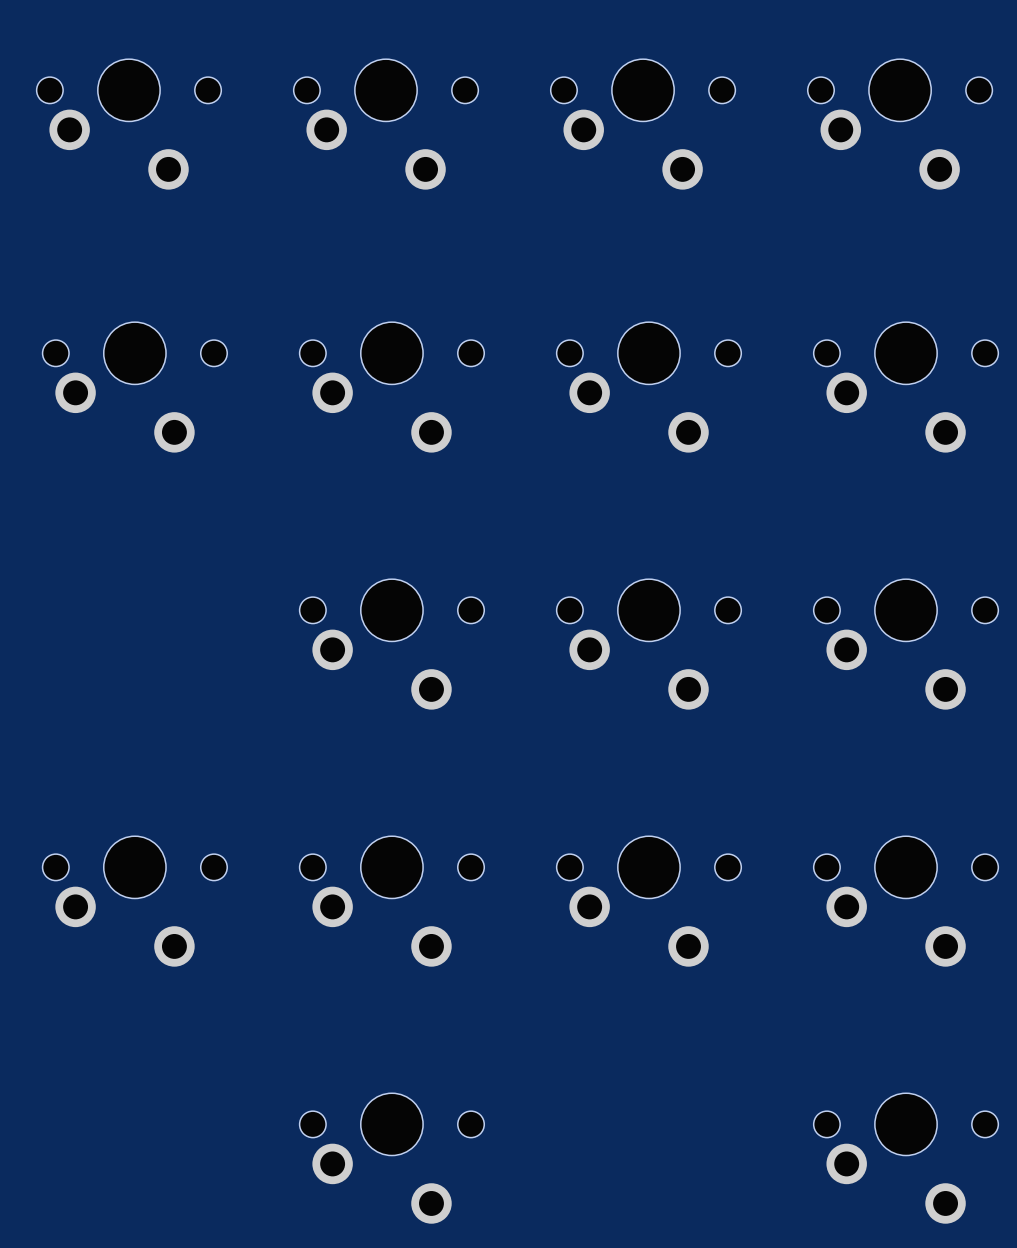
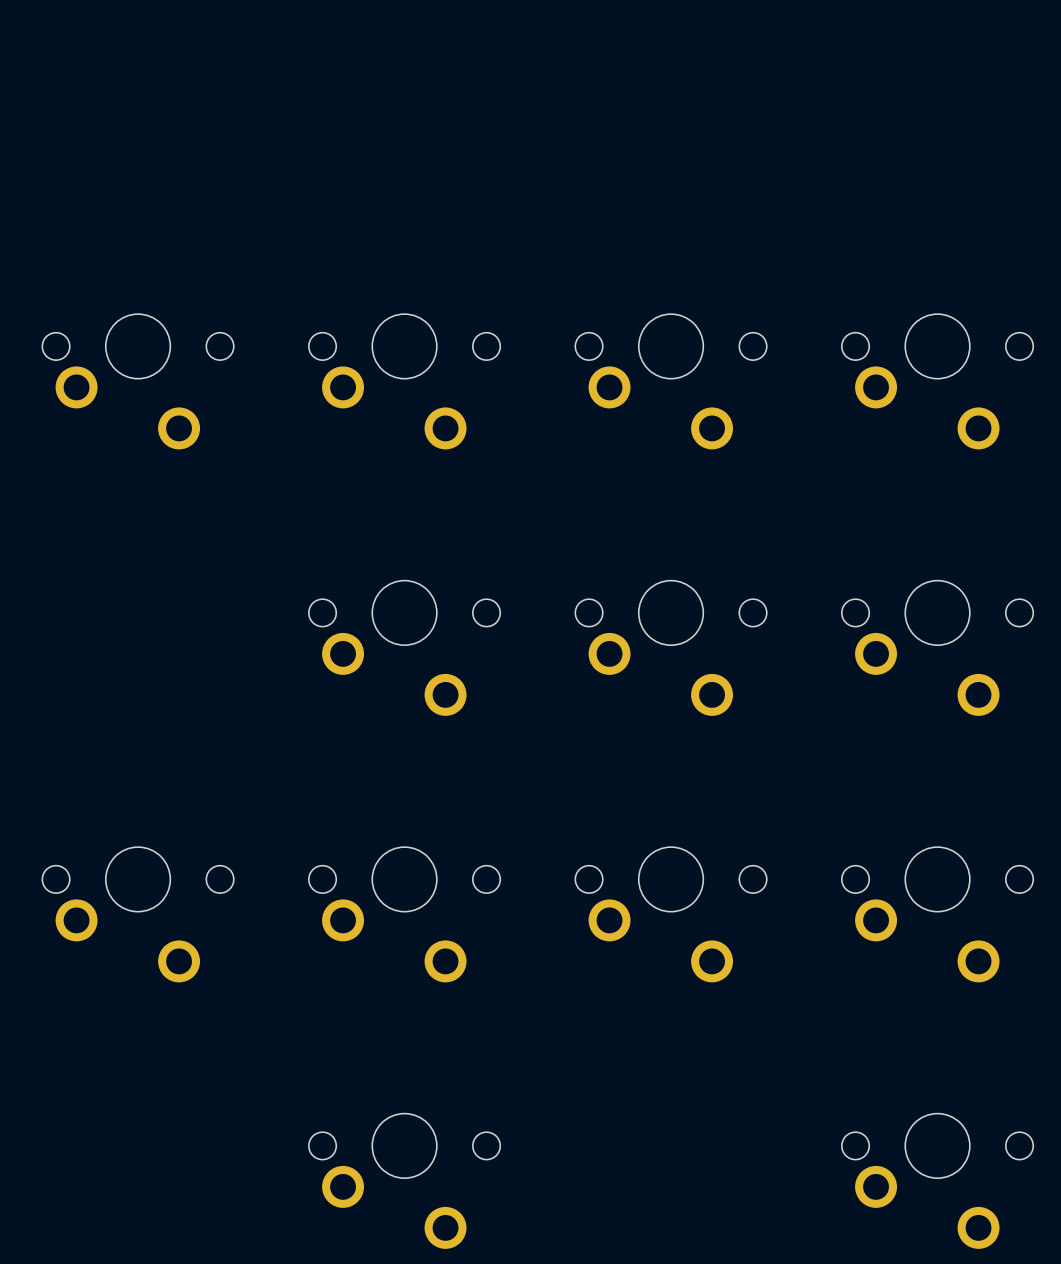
part: (128, 124) -> none
part: (386, 124) -> none
part: (643, 124) -> none
part: (900, 124) -> none

